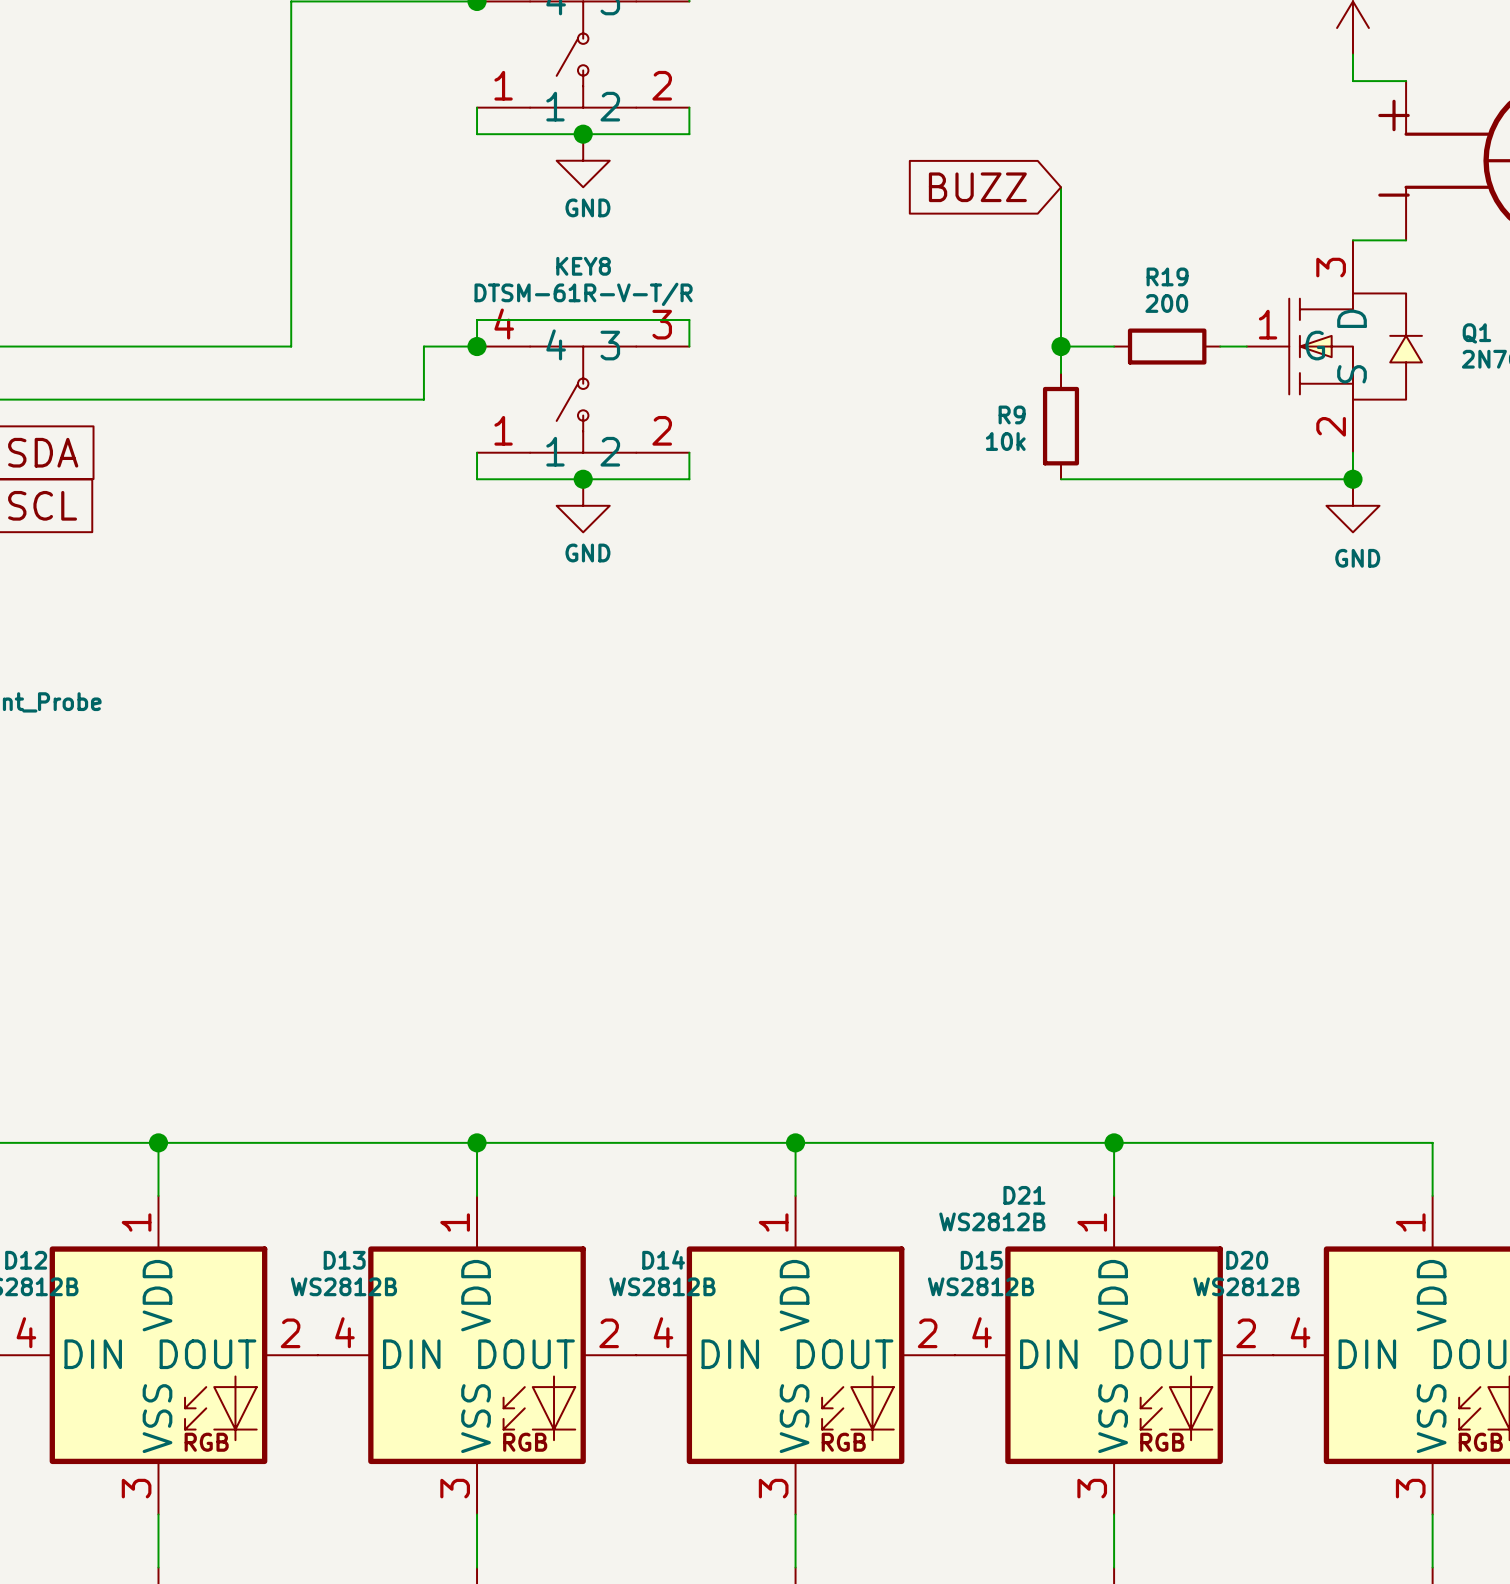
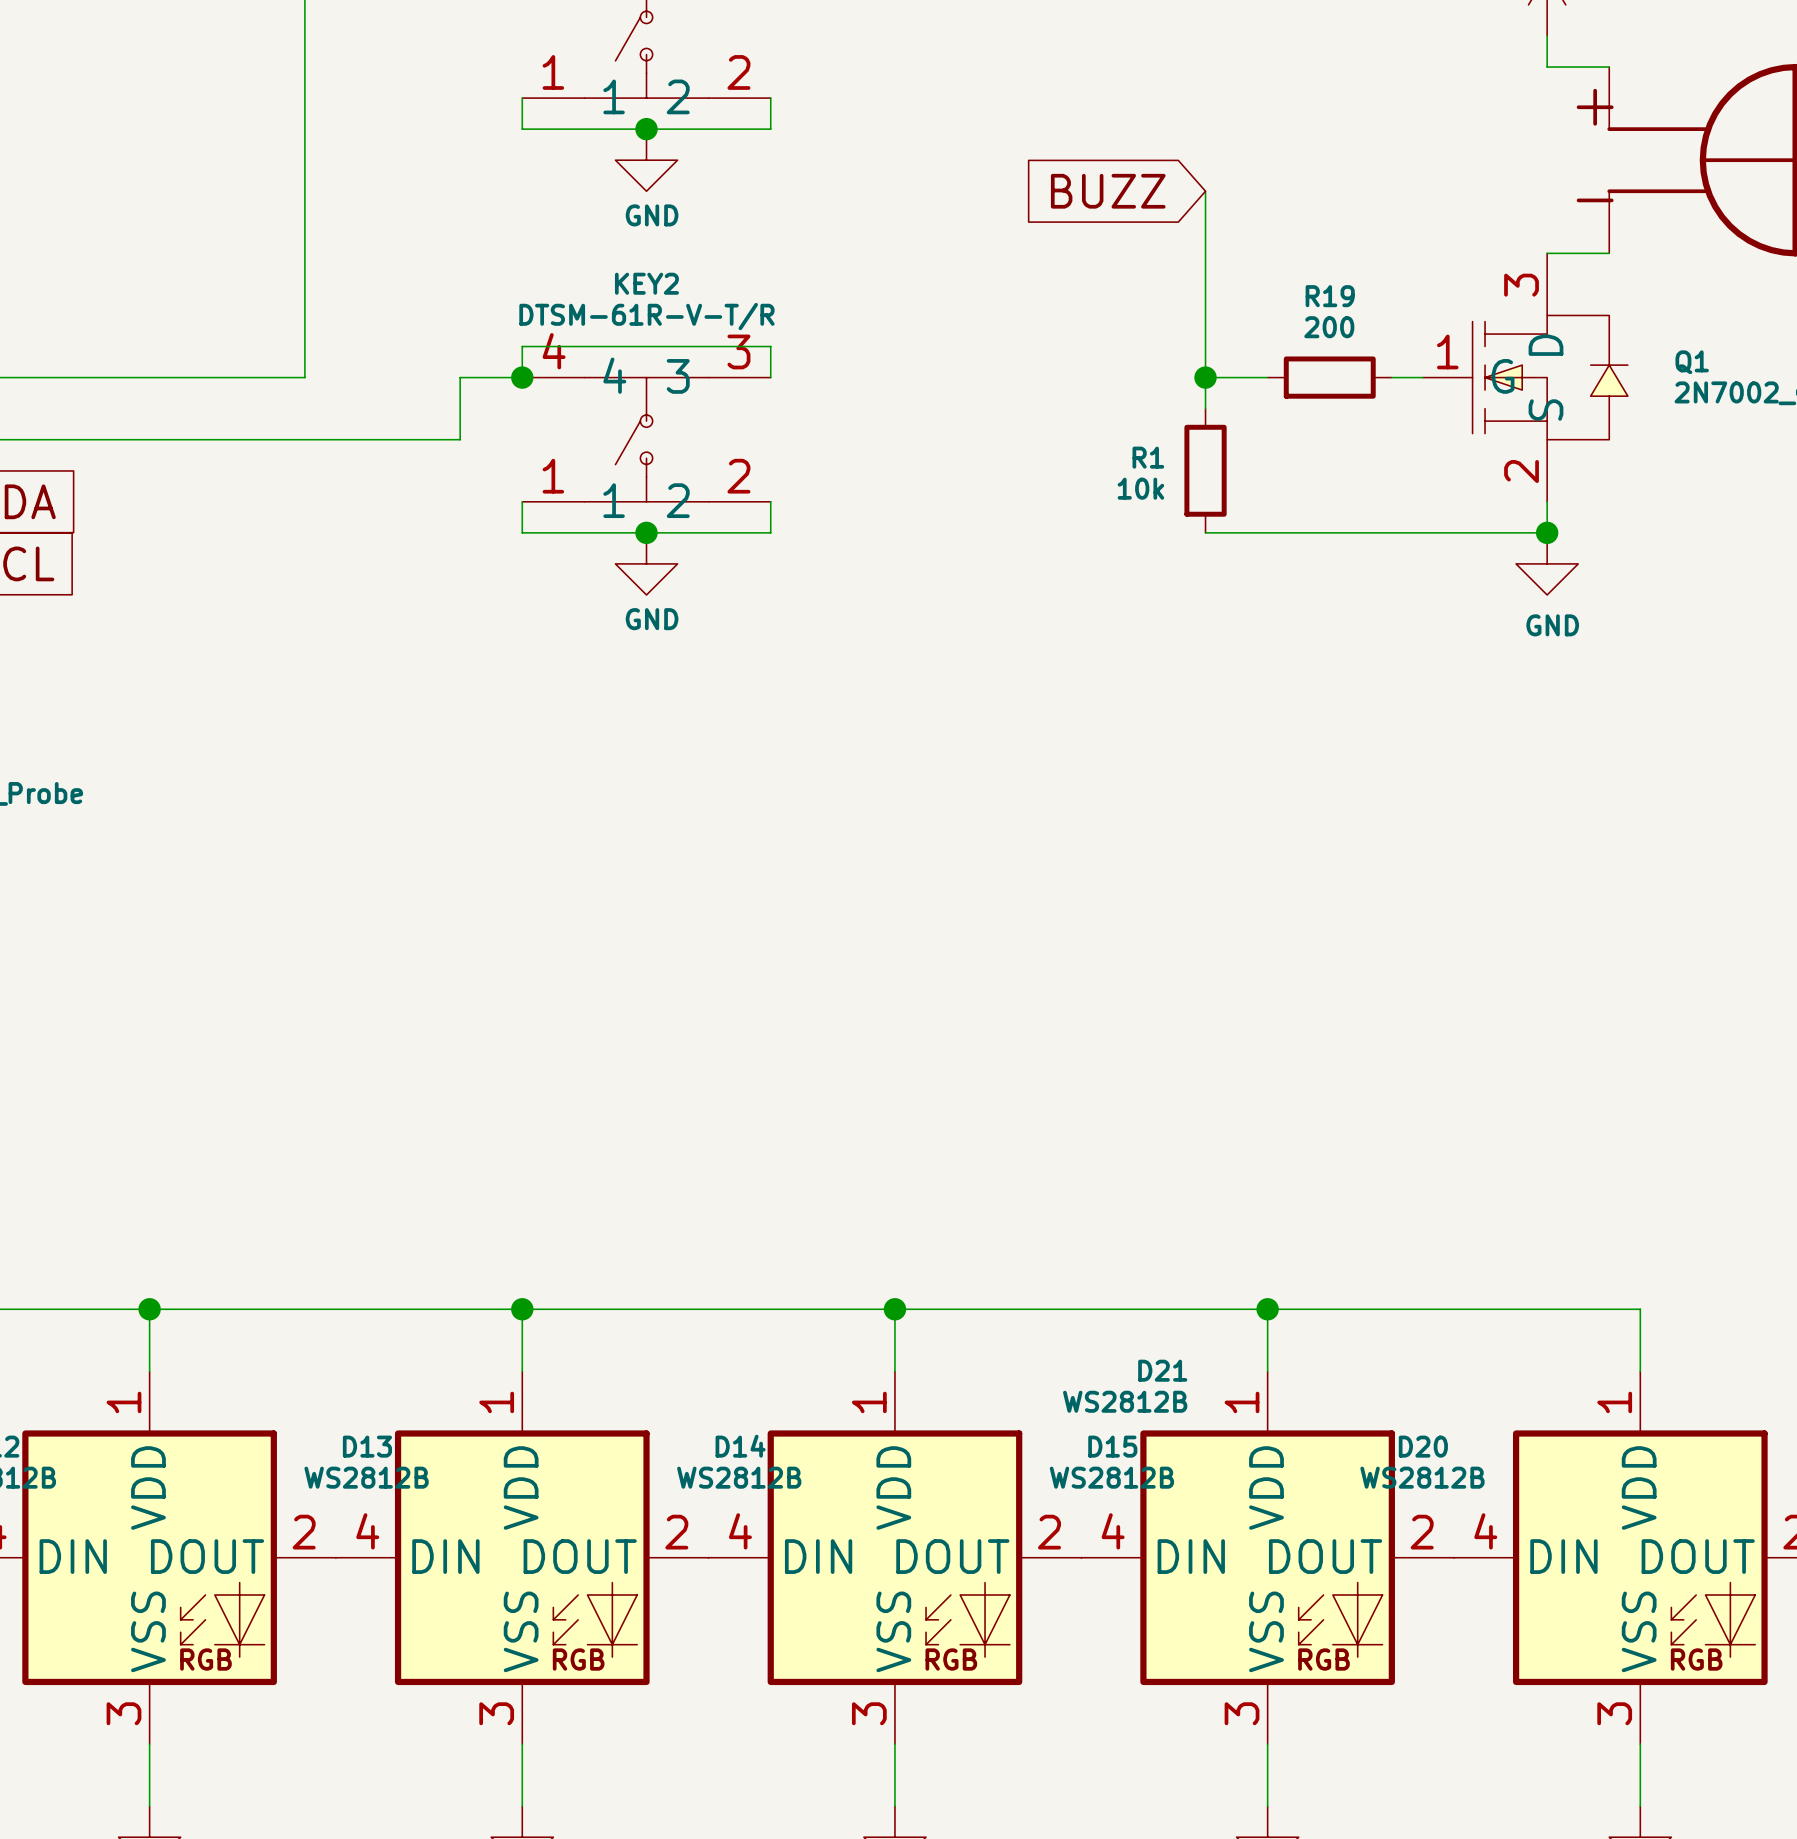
KEY8 name: KEY8 (583, 266) -> KEY2 (646, 283)
R9 name: R9 (1012, 414) -> R1 (1148, 457)

